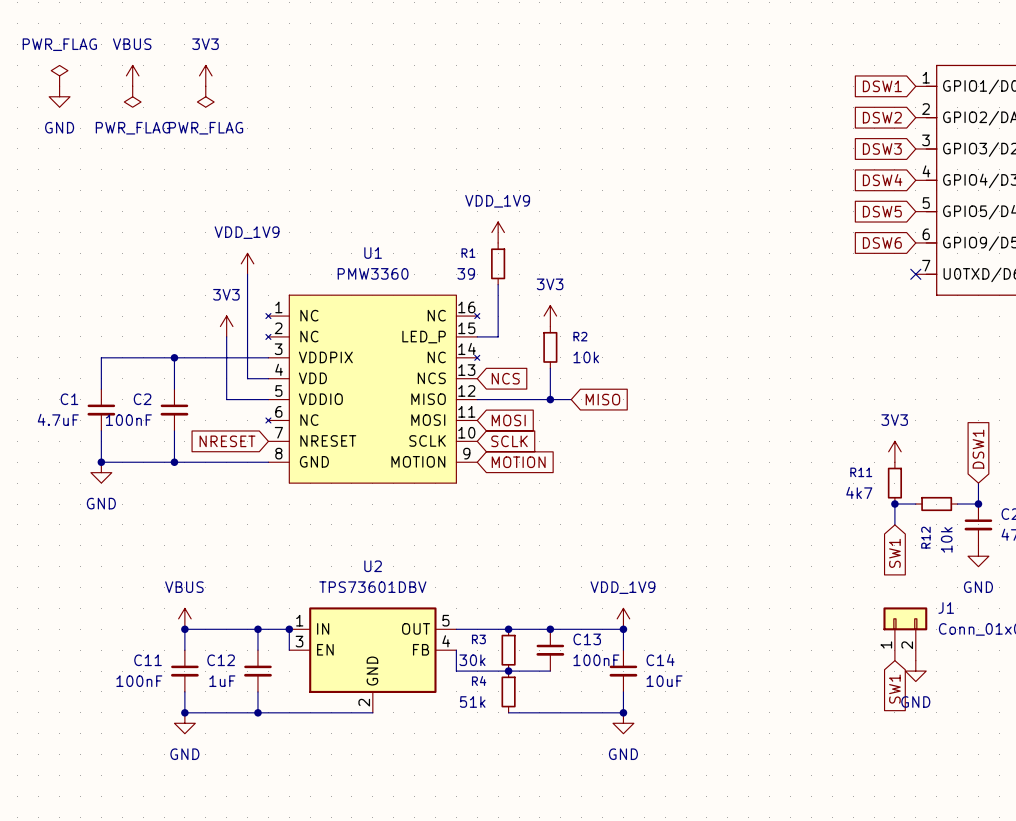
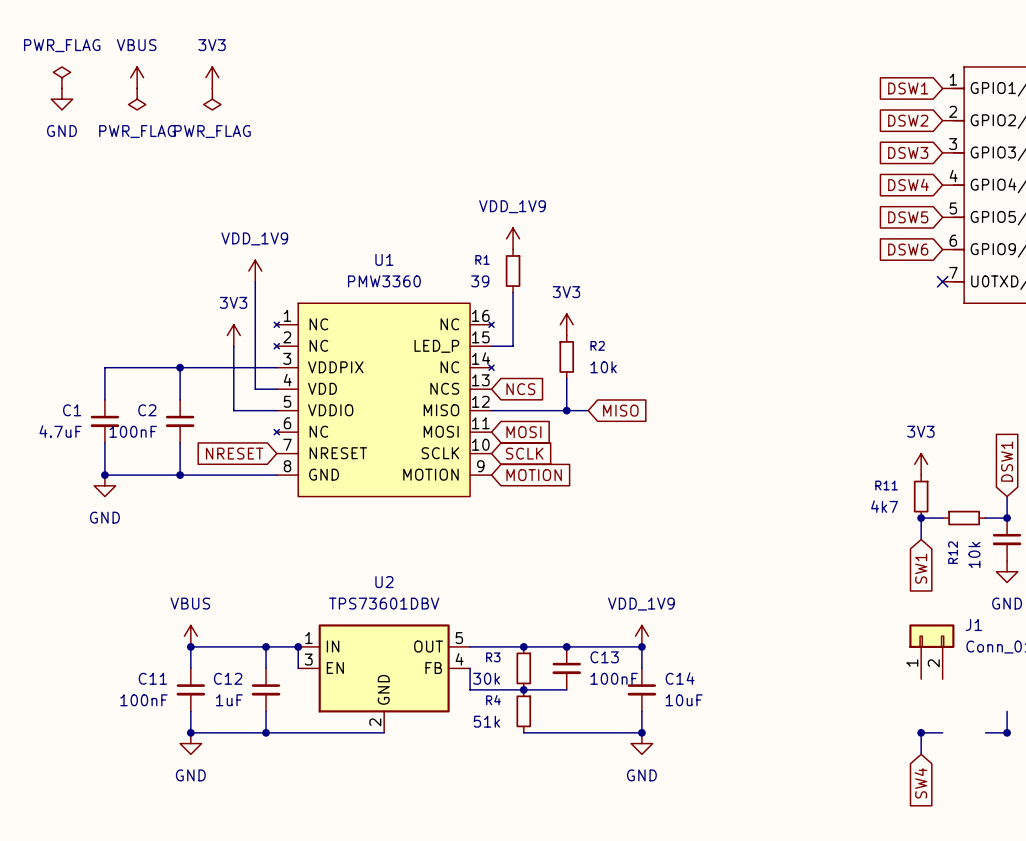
power symbol: GND (915, 671) -> none
global label: SW1 (894, 689) -> none
wire: none -> (1007, 711) (1007, 732) (985, 732)
junction: none -> (921, 732)
wire: none -> (942, 732) (921, 732) (921, 754)
junction: none -> (1007, 732)
global label: none -> SW4 (920, 783)

